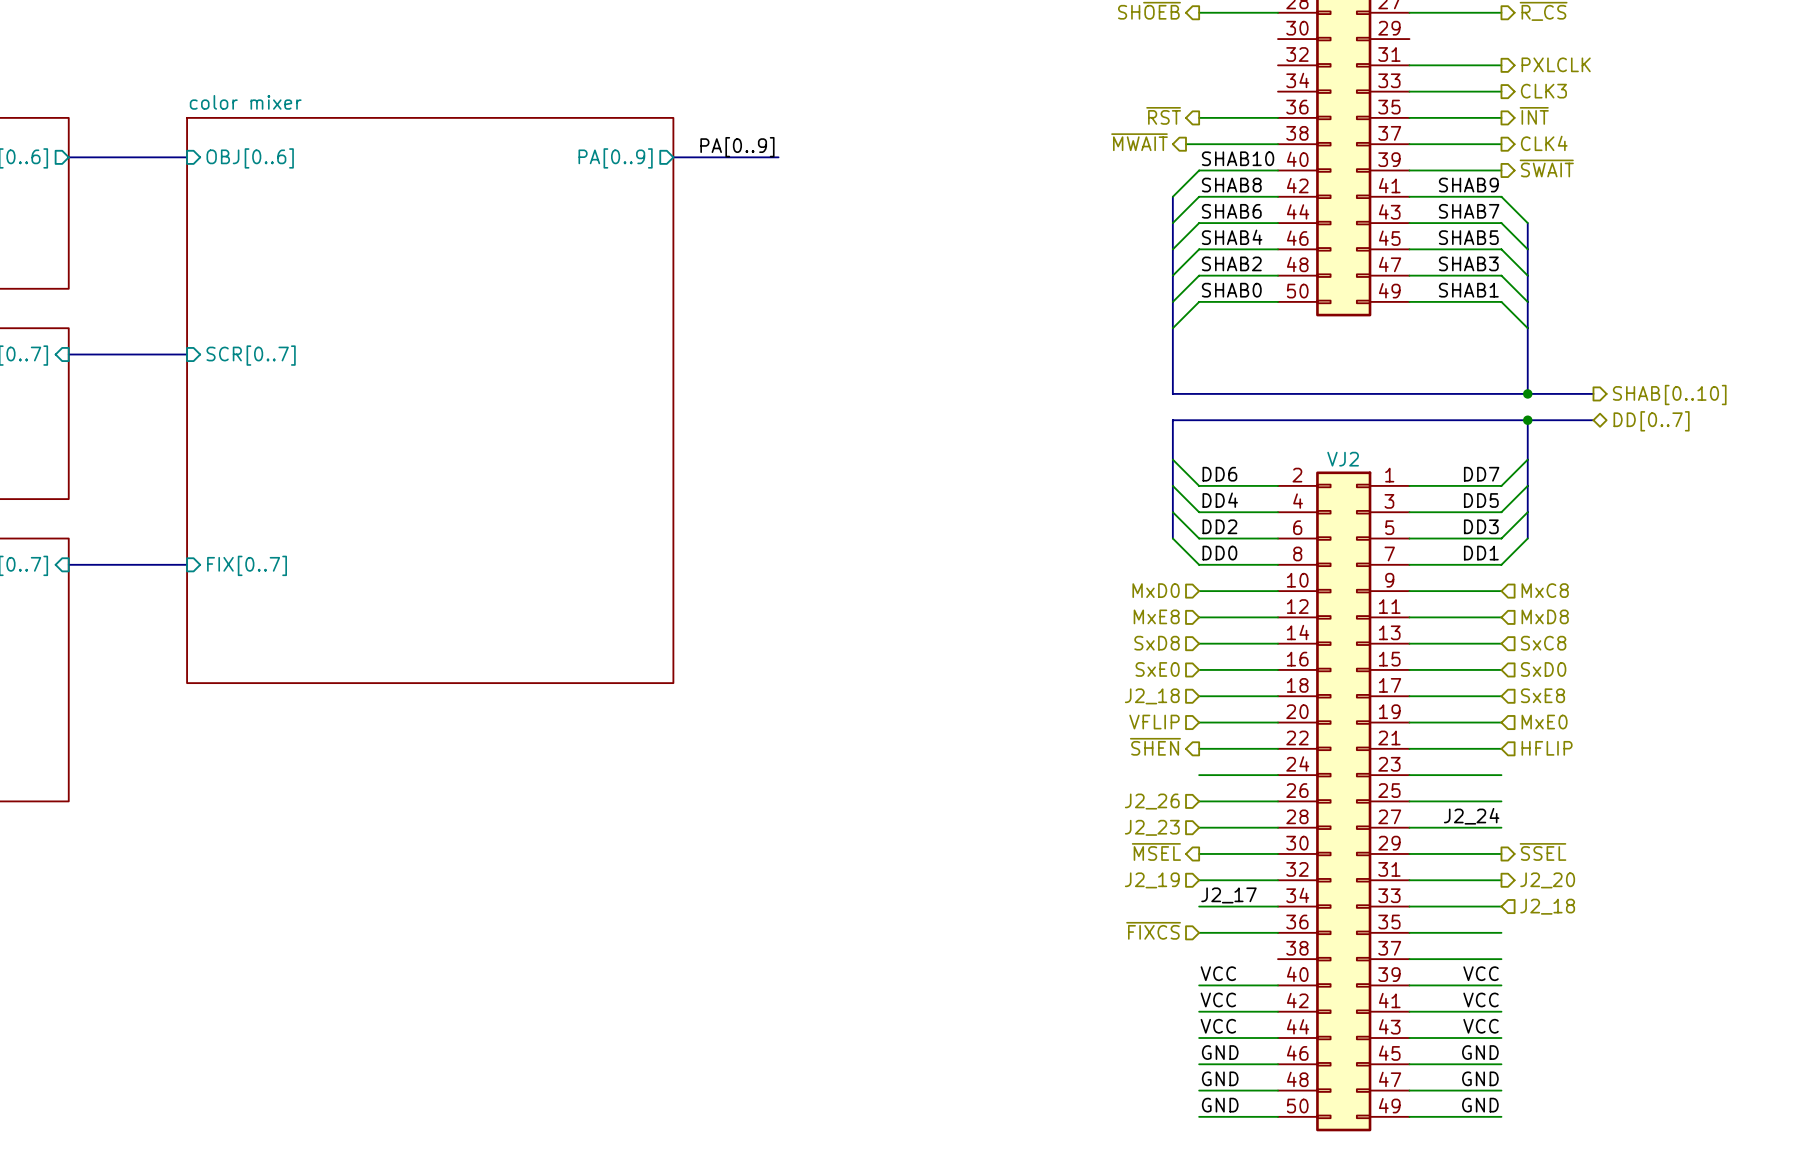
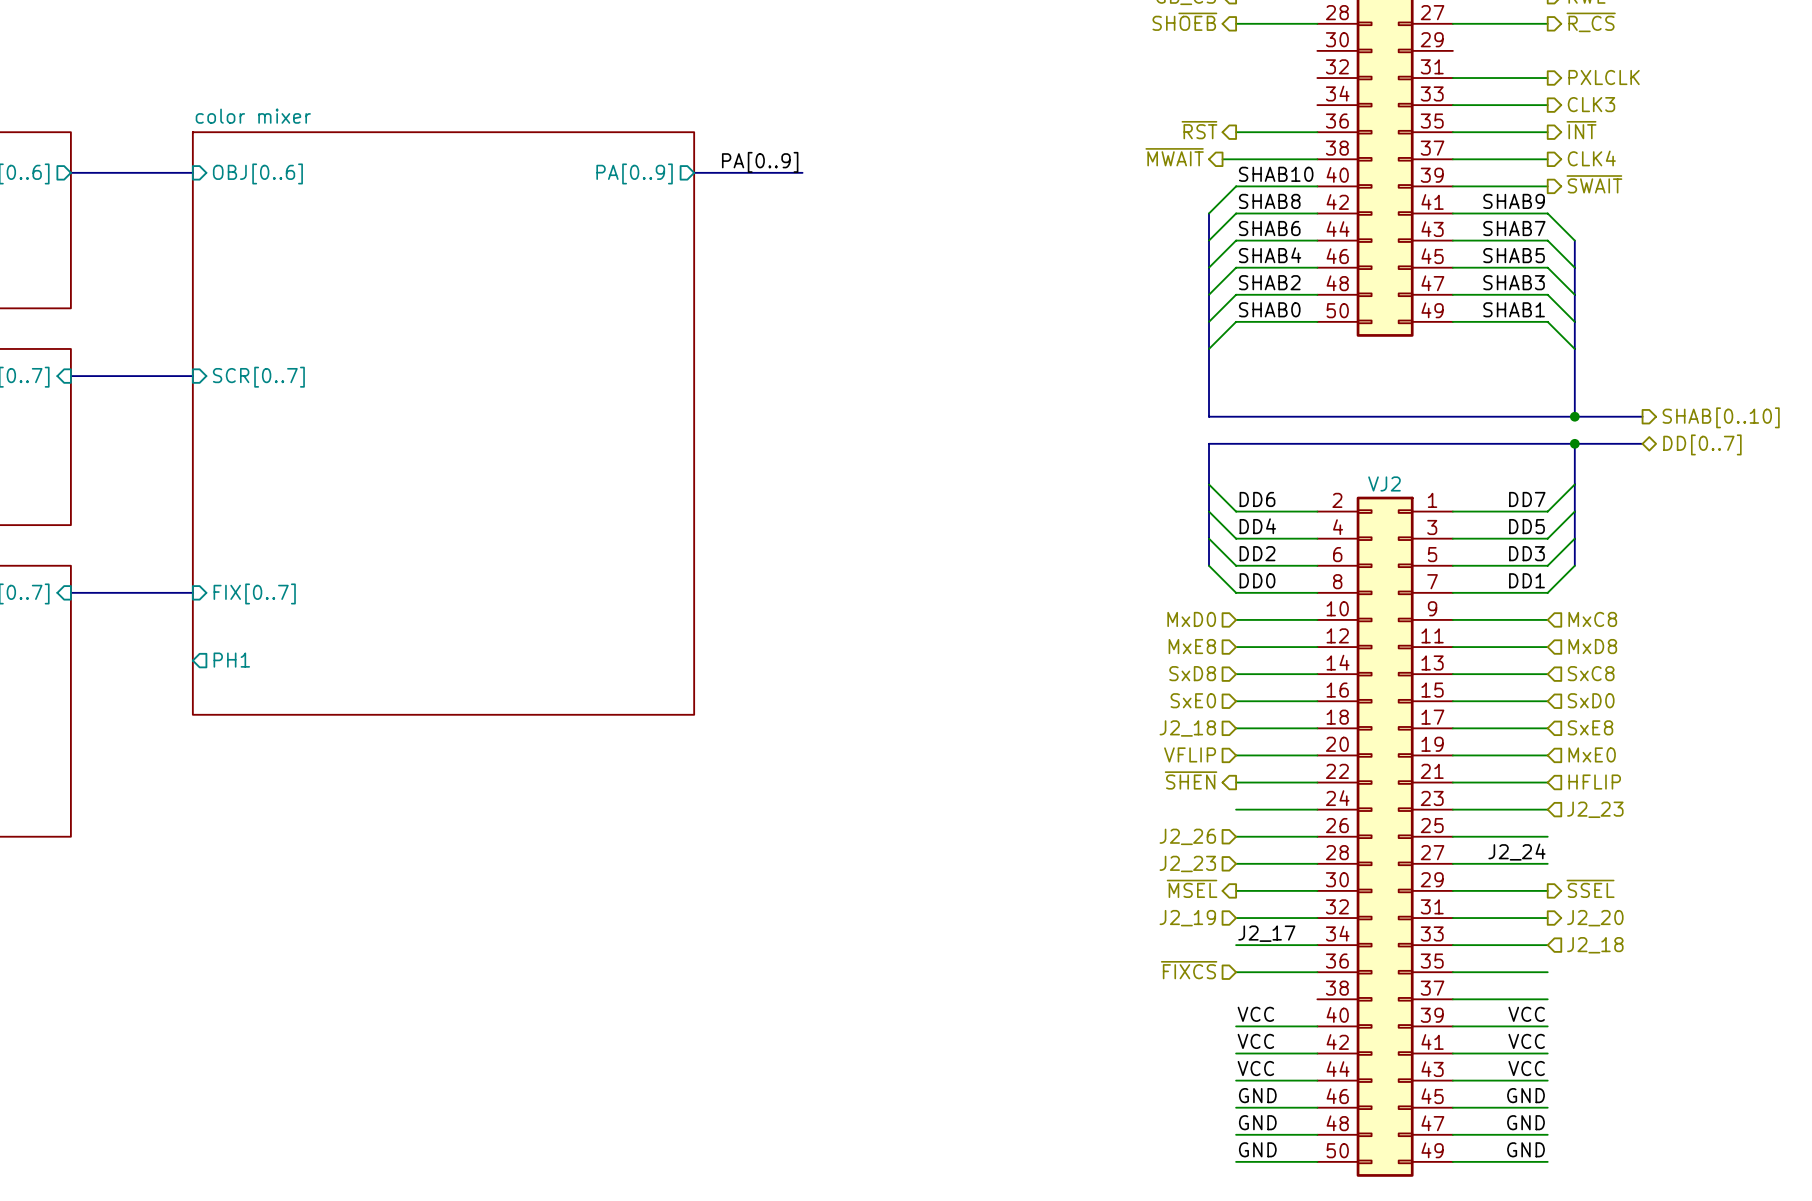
sheet pin: none -> PH1 (231, 660)
hierarchical label: none -> J2_23 (1595, 809)

